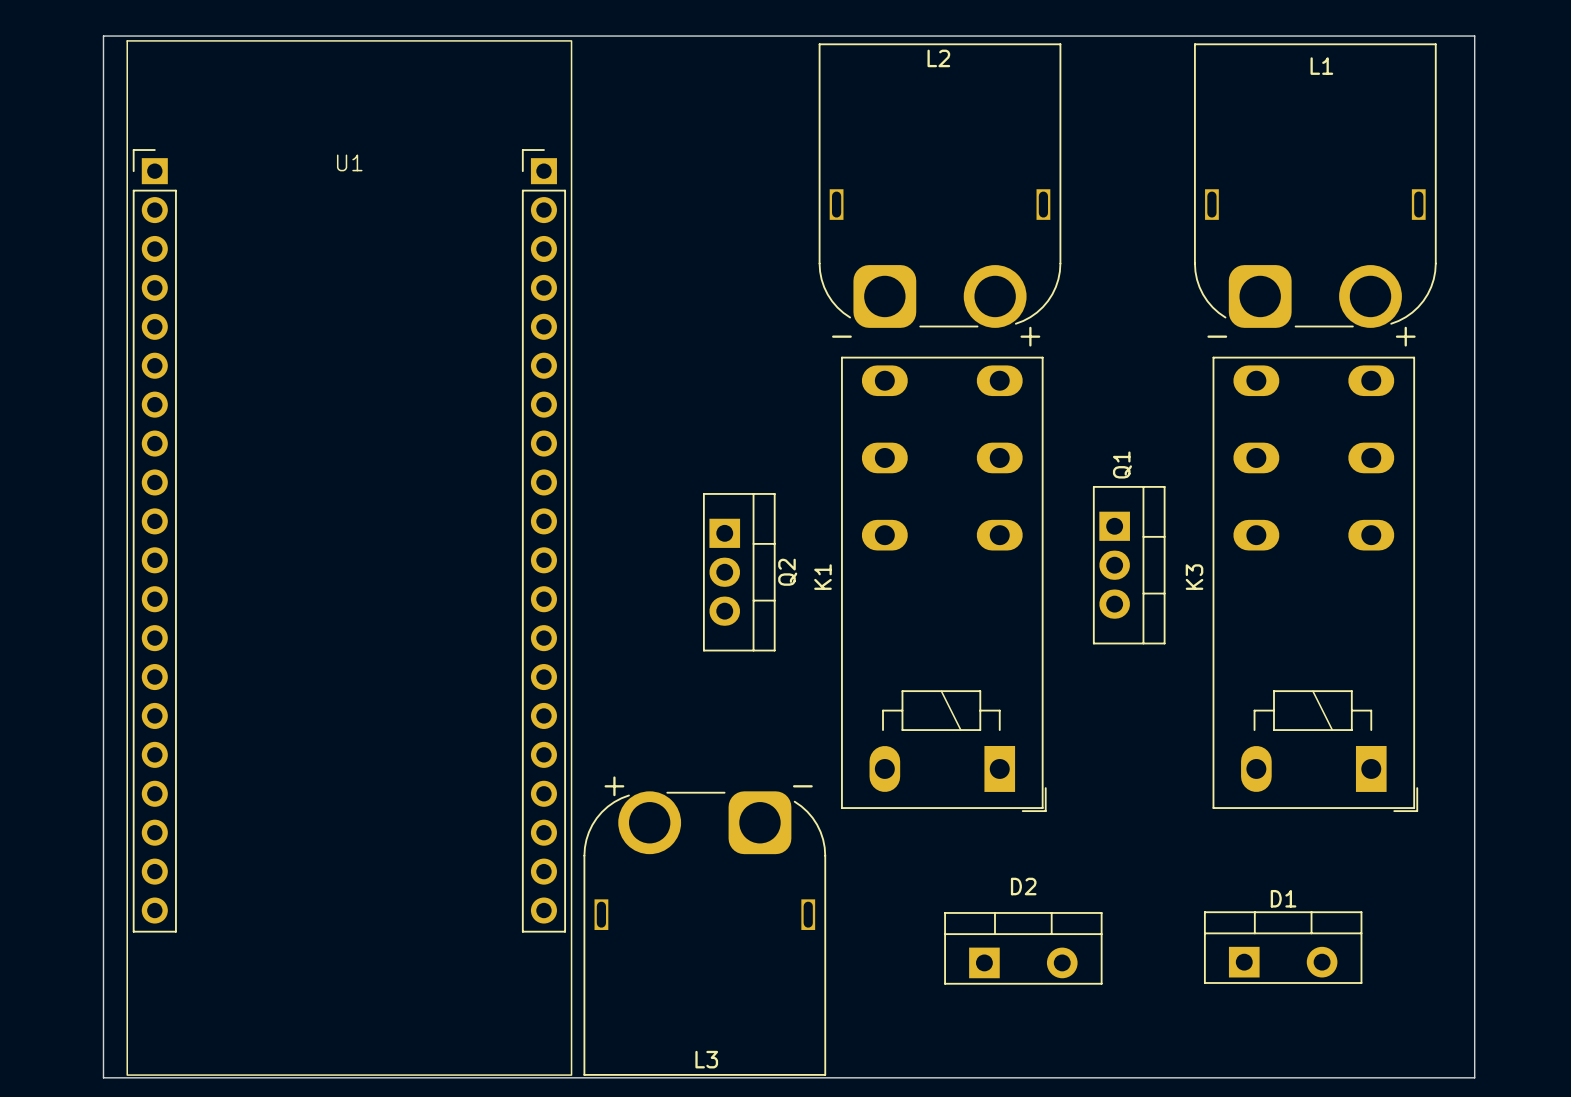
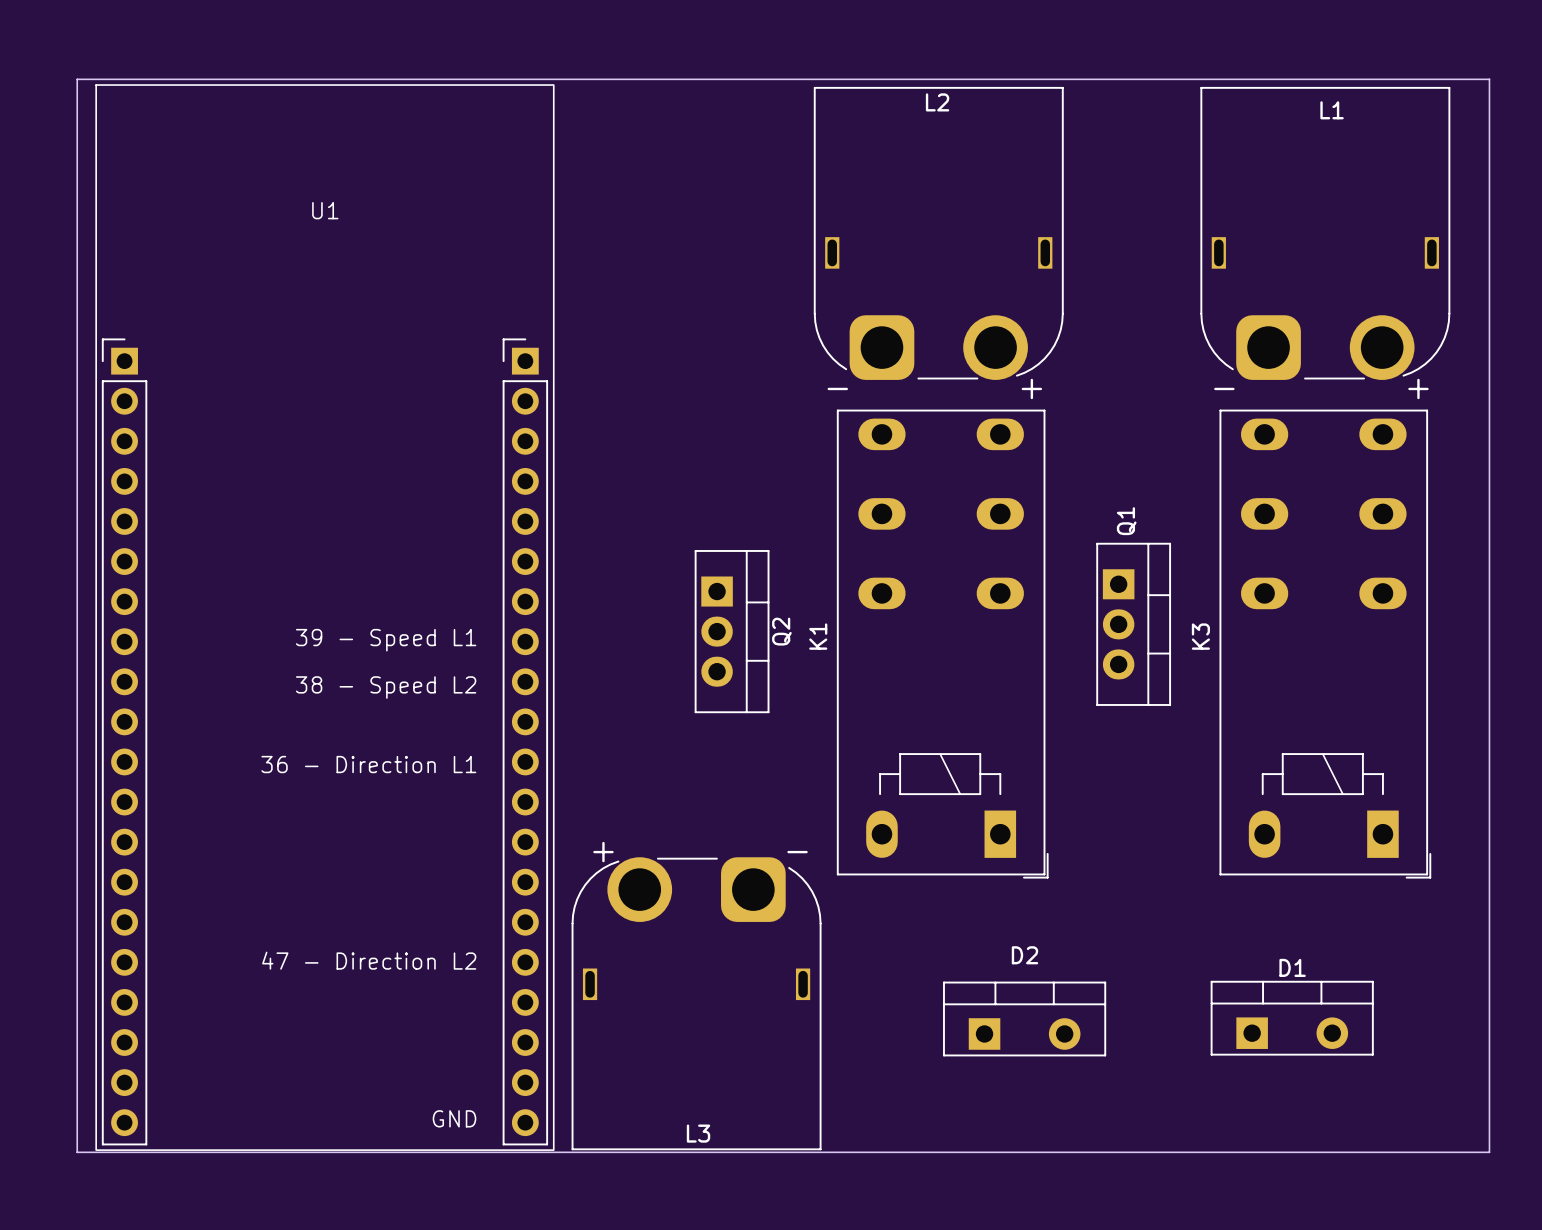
U1 footprint: [126, 40, 573, 1076] -> [95, 84, 555, 1151]
text: none -> 39 - Speed L1 (386, 640)
text: none -> 38 - Speed L2 (386, 687)
text: none -> 36 - Direction L1 (368, 764)
text: none -> 47 - Direction L2 (369, 960)
text: none -> GND (454, 1118)

